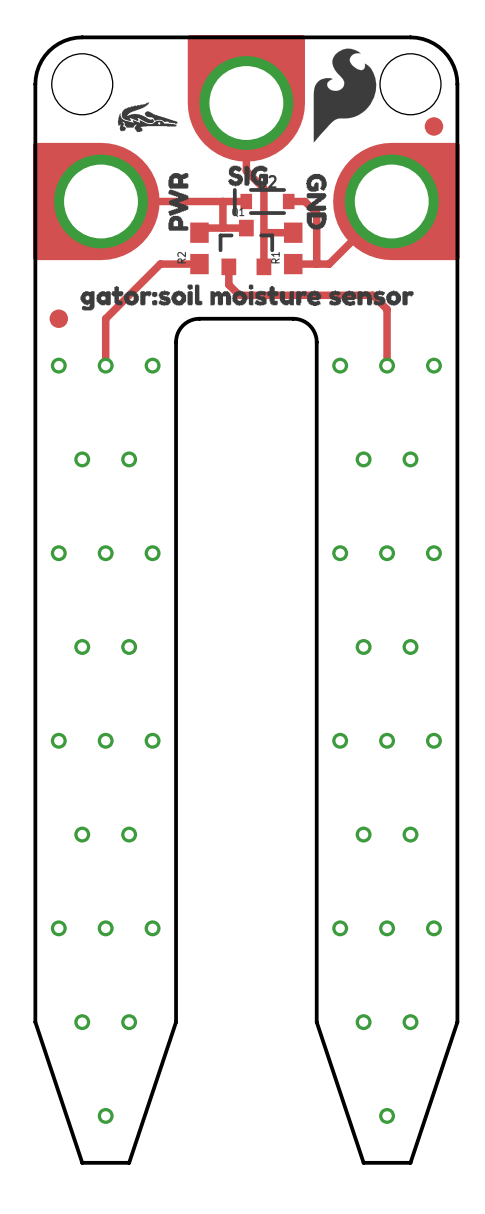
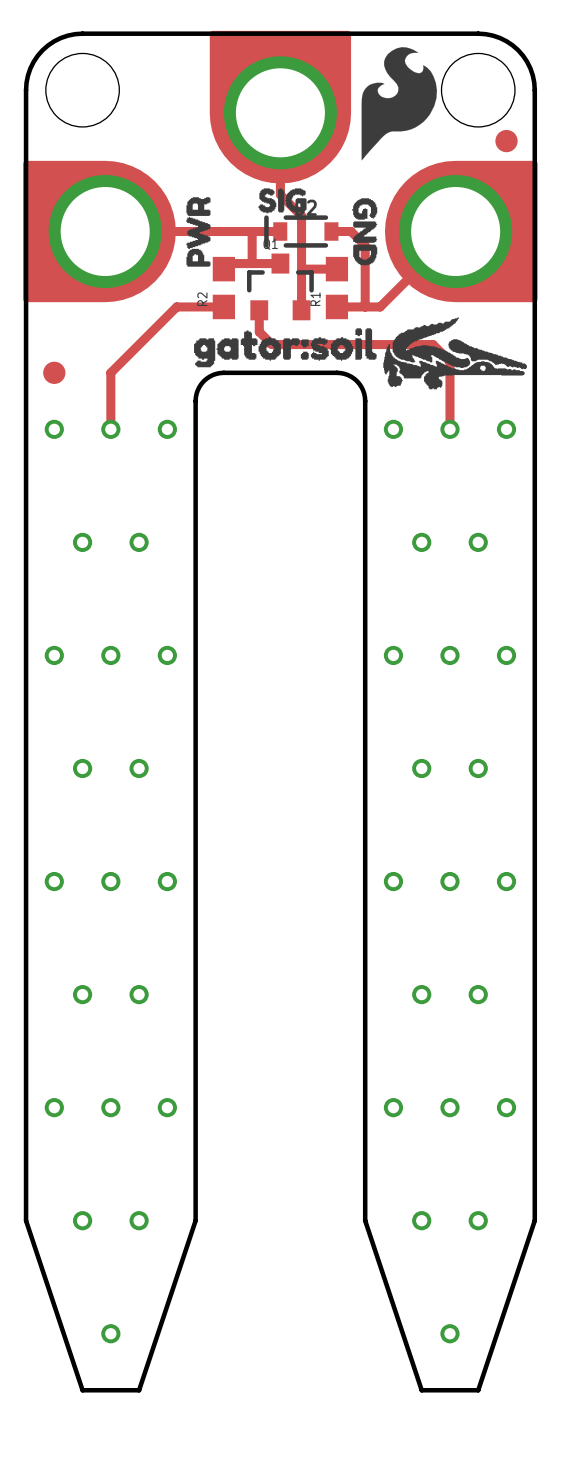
drawing: [117, 102, 178, 133] -> none
drawing: none -> [383, 317, 527, 390]
drawing shape: [80, 284, 414, 311] -> [194, 328, 377, 368]

